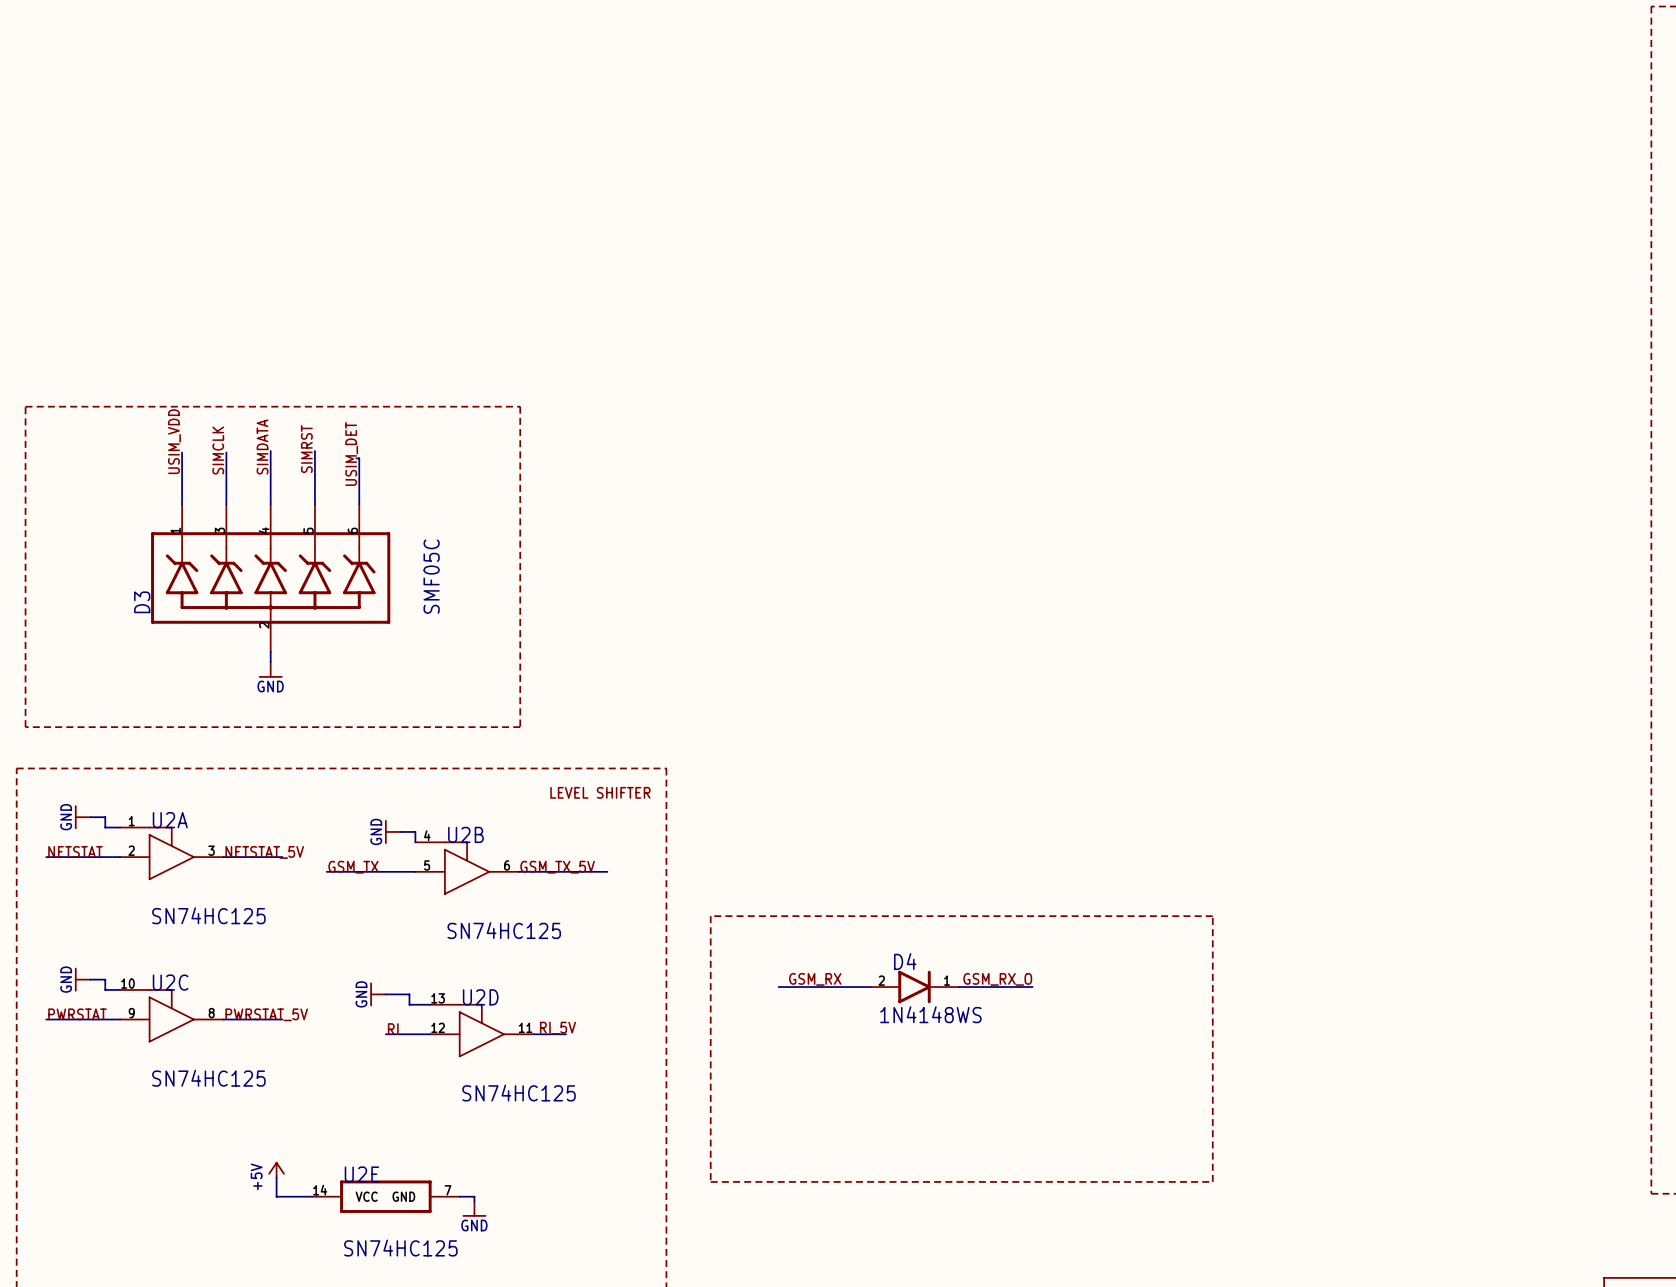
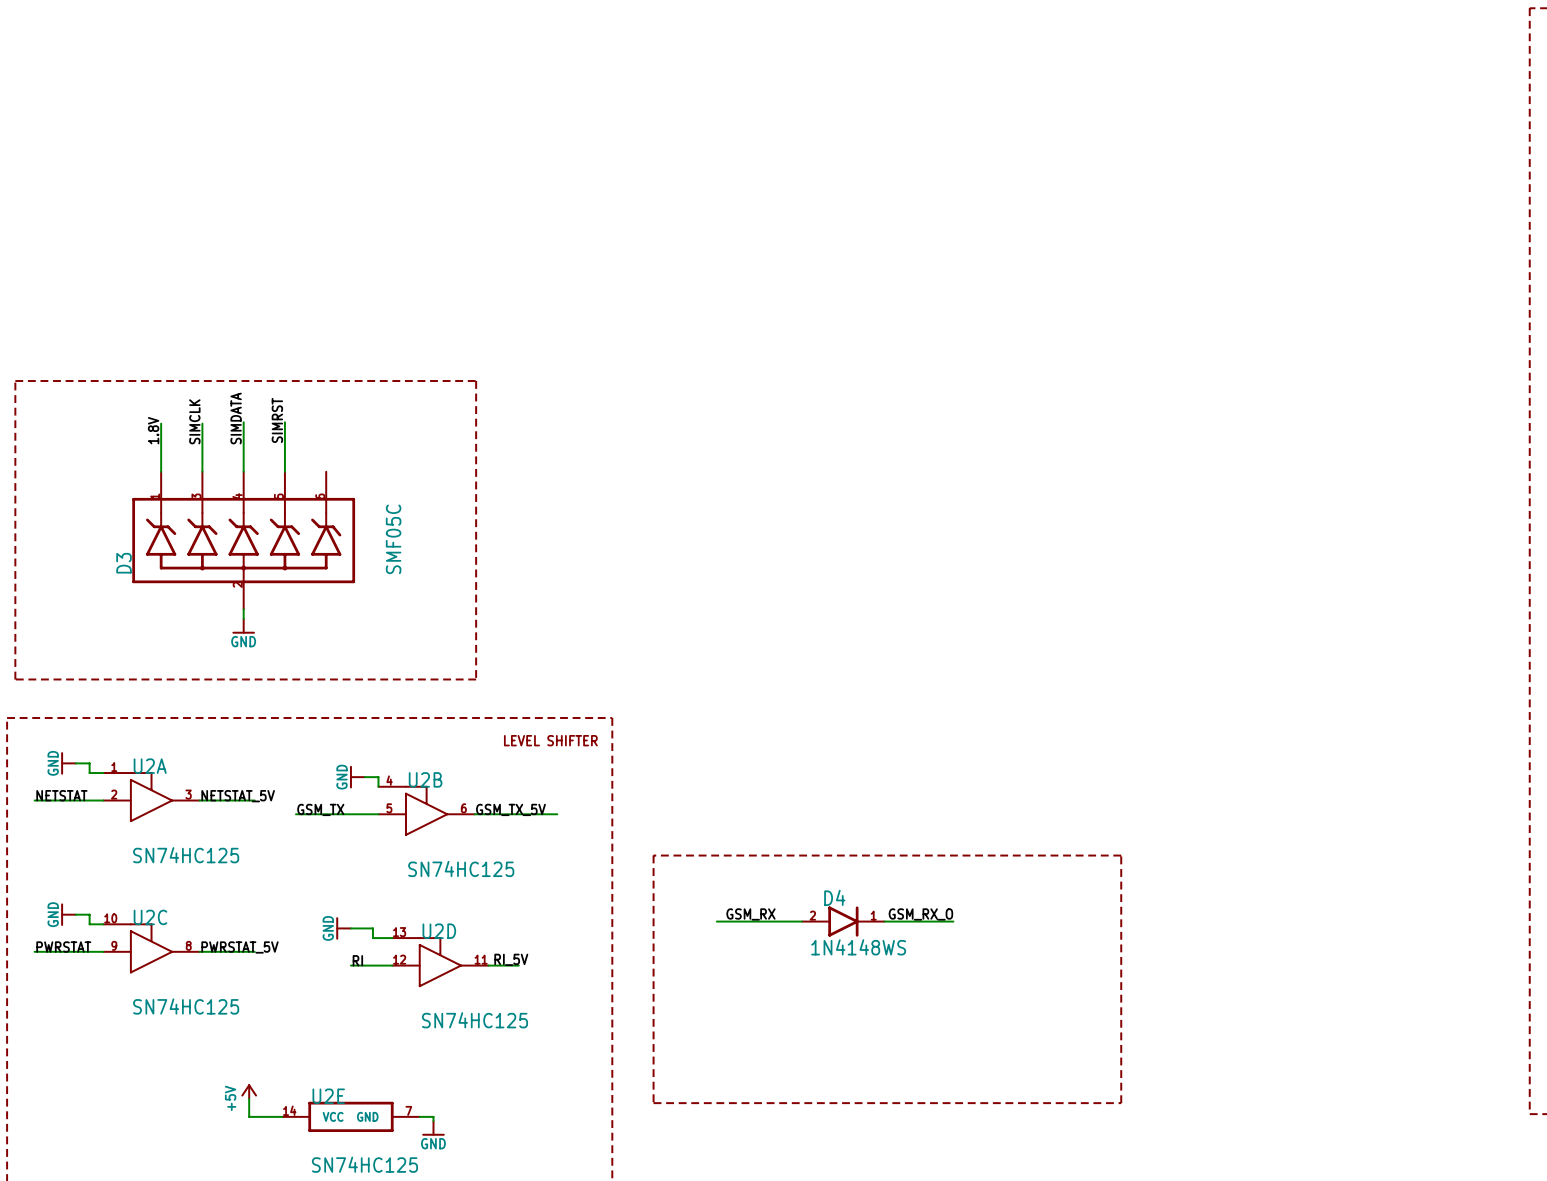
label: USIM_VDD (174, 441) -> 1.8V (153, 430)
label: USIM_DET (351, 453) -> none
wire: (356, 458) (359, 458) (359, 504) -> none

